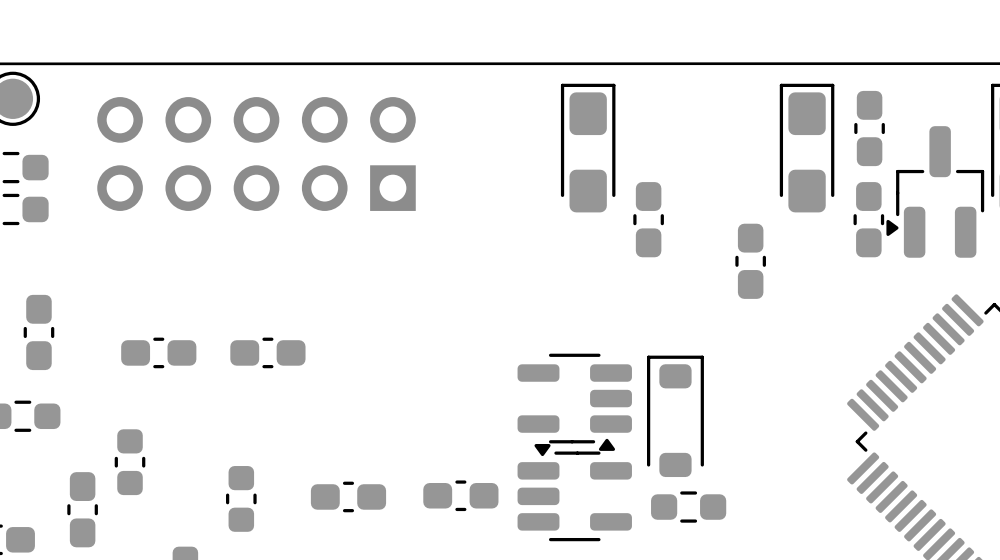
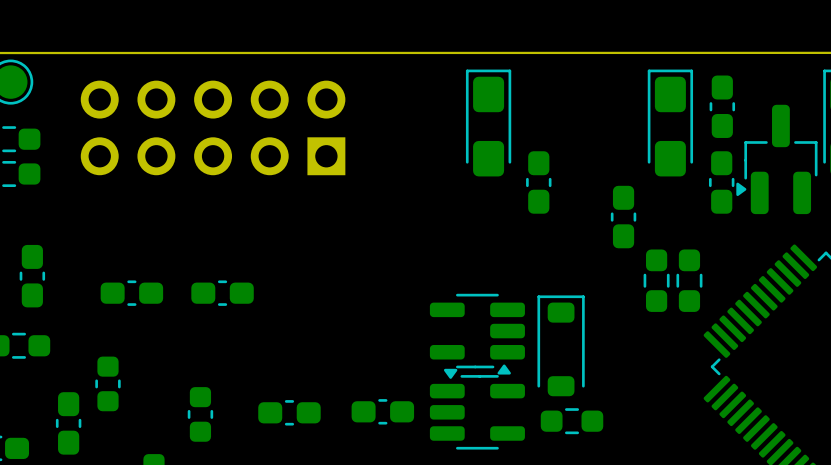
part: none -> (656, 280)
part: none -> (689, 280)

